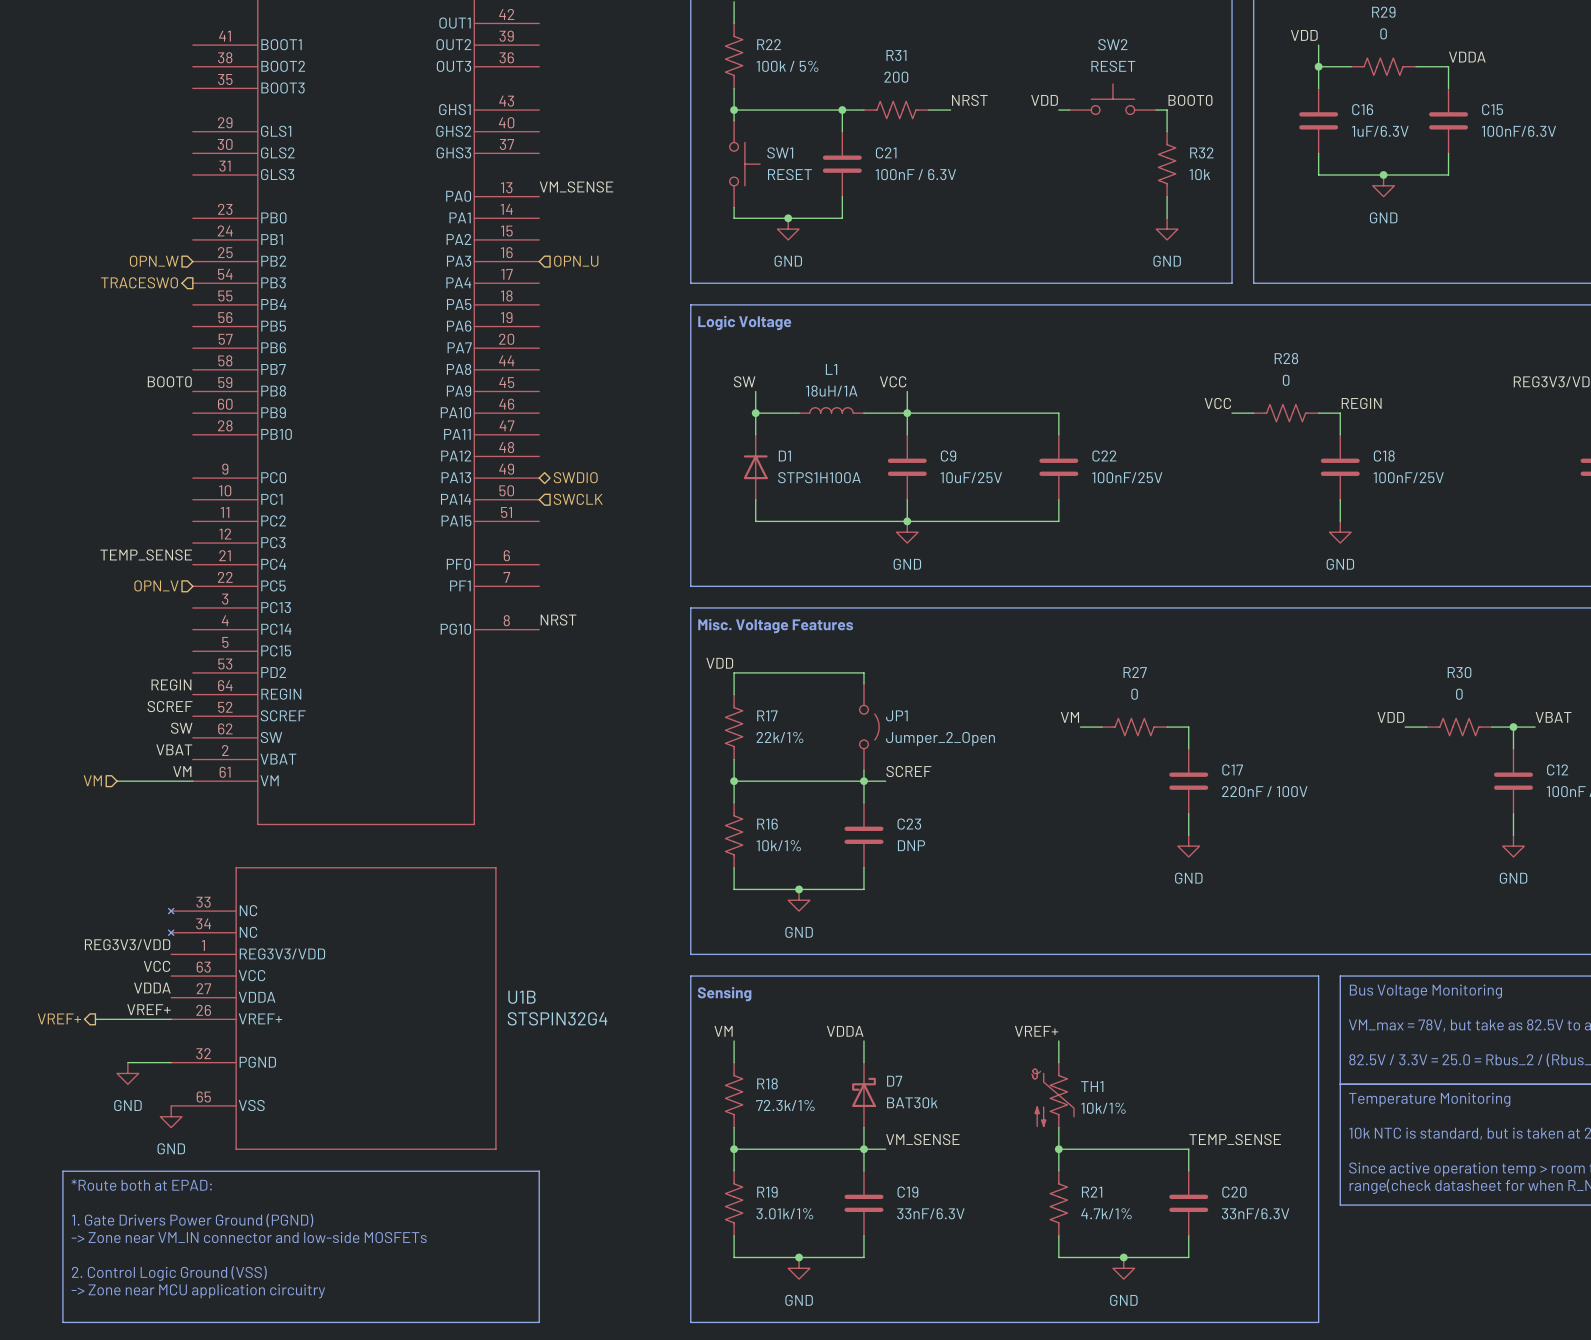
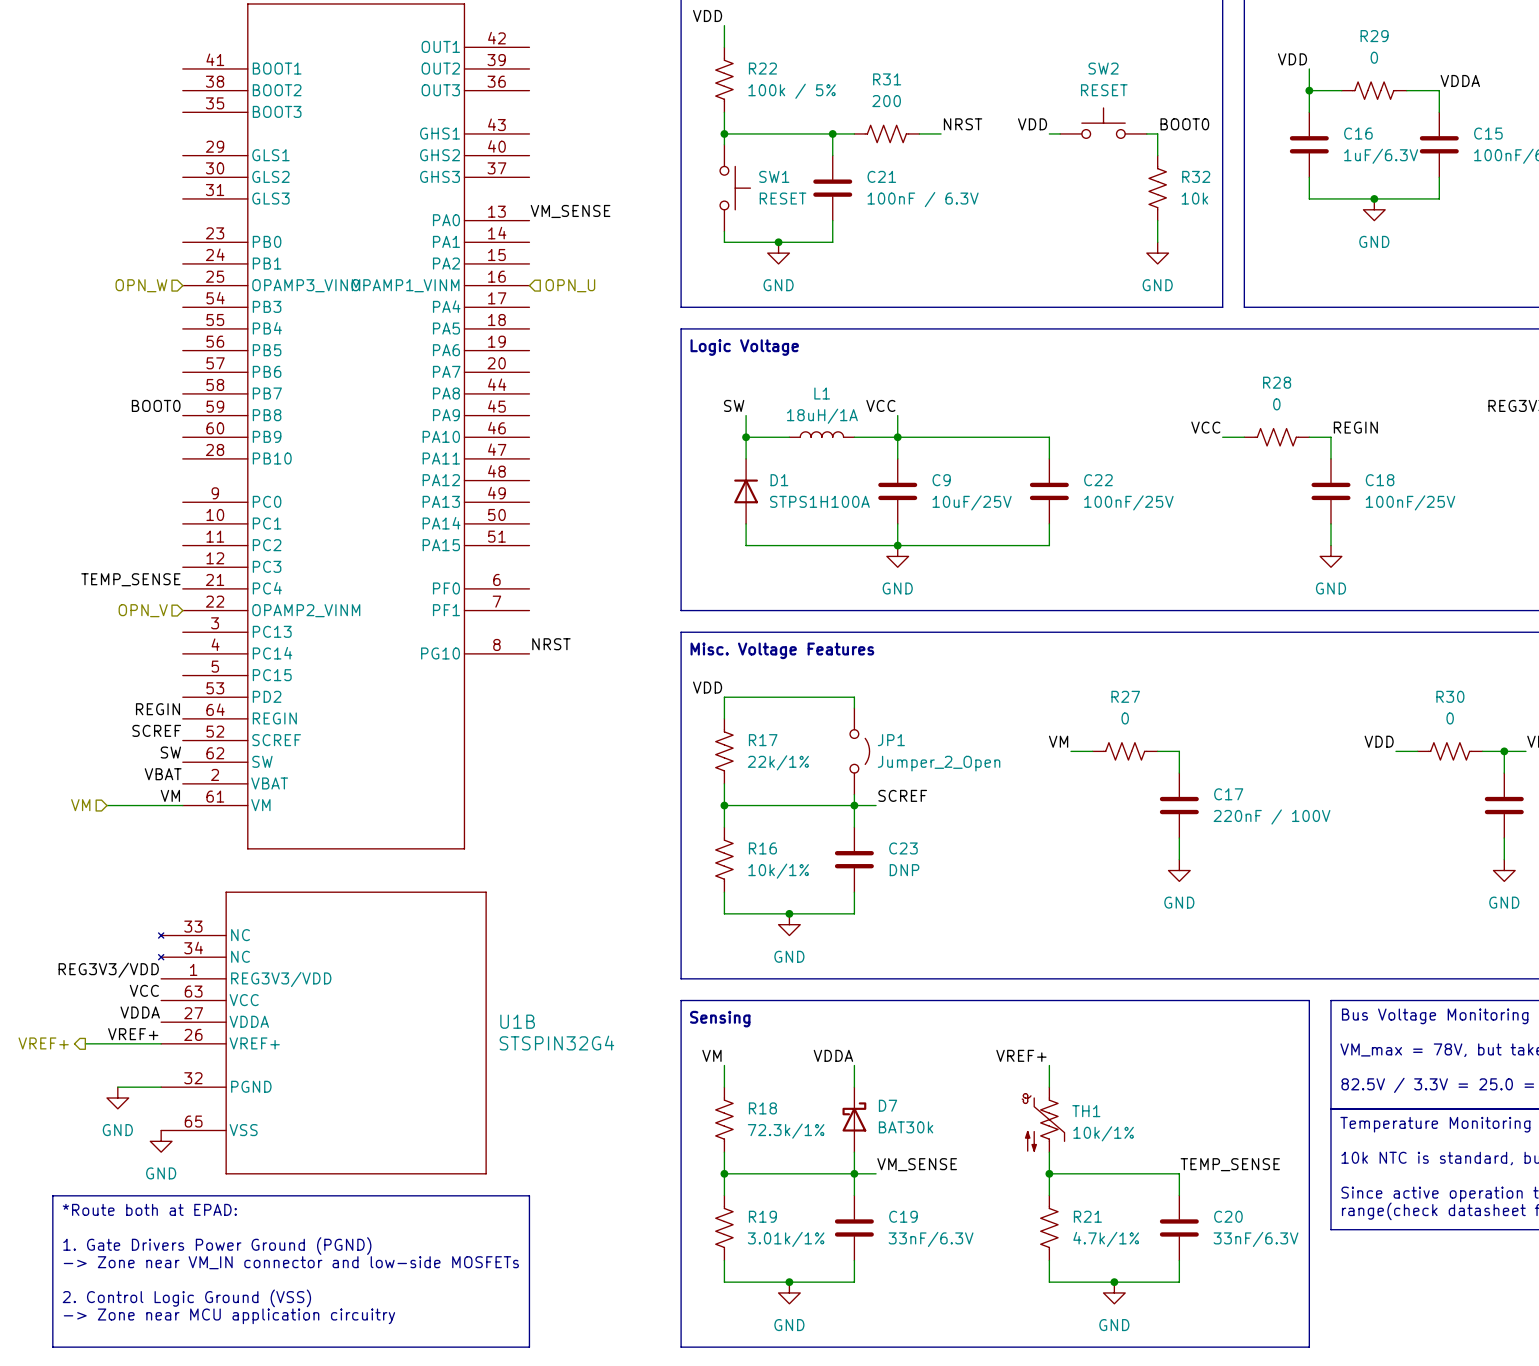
part pin name: PB2 (273, 261) -> OPAMP3_VINM (306, 285)
part pin name: PA3 (459, 261) -> OPAMP1_VINM (405, 285)
hierarchical label: TRACESWO (139, 282) -> none
hierarchical label: SWDIO (575, 477) -> none
hierarchical label: SWCLK (578, 499) -> none
part pin name: PC5 (273, 585) -> OPAMP2_VINM (306, 610)

